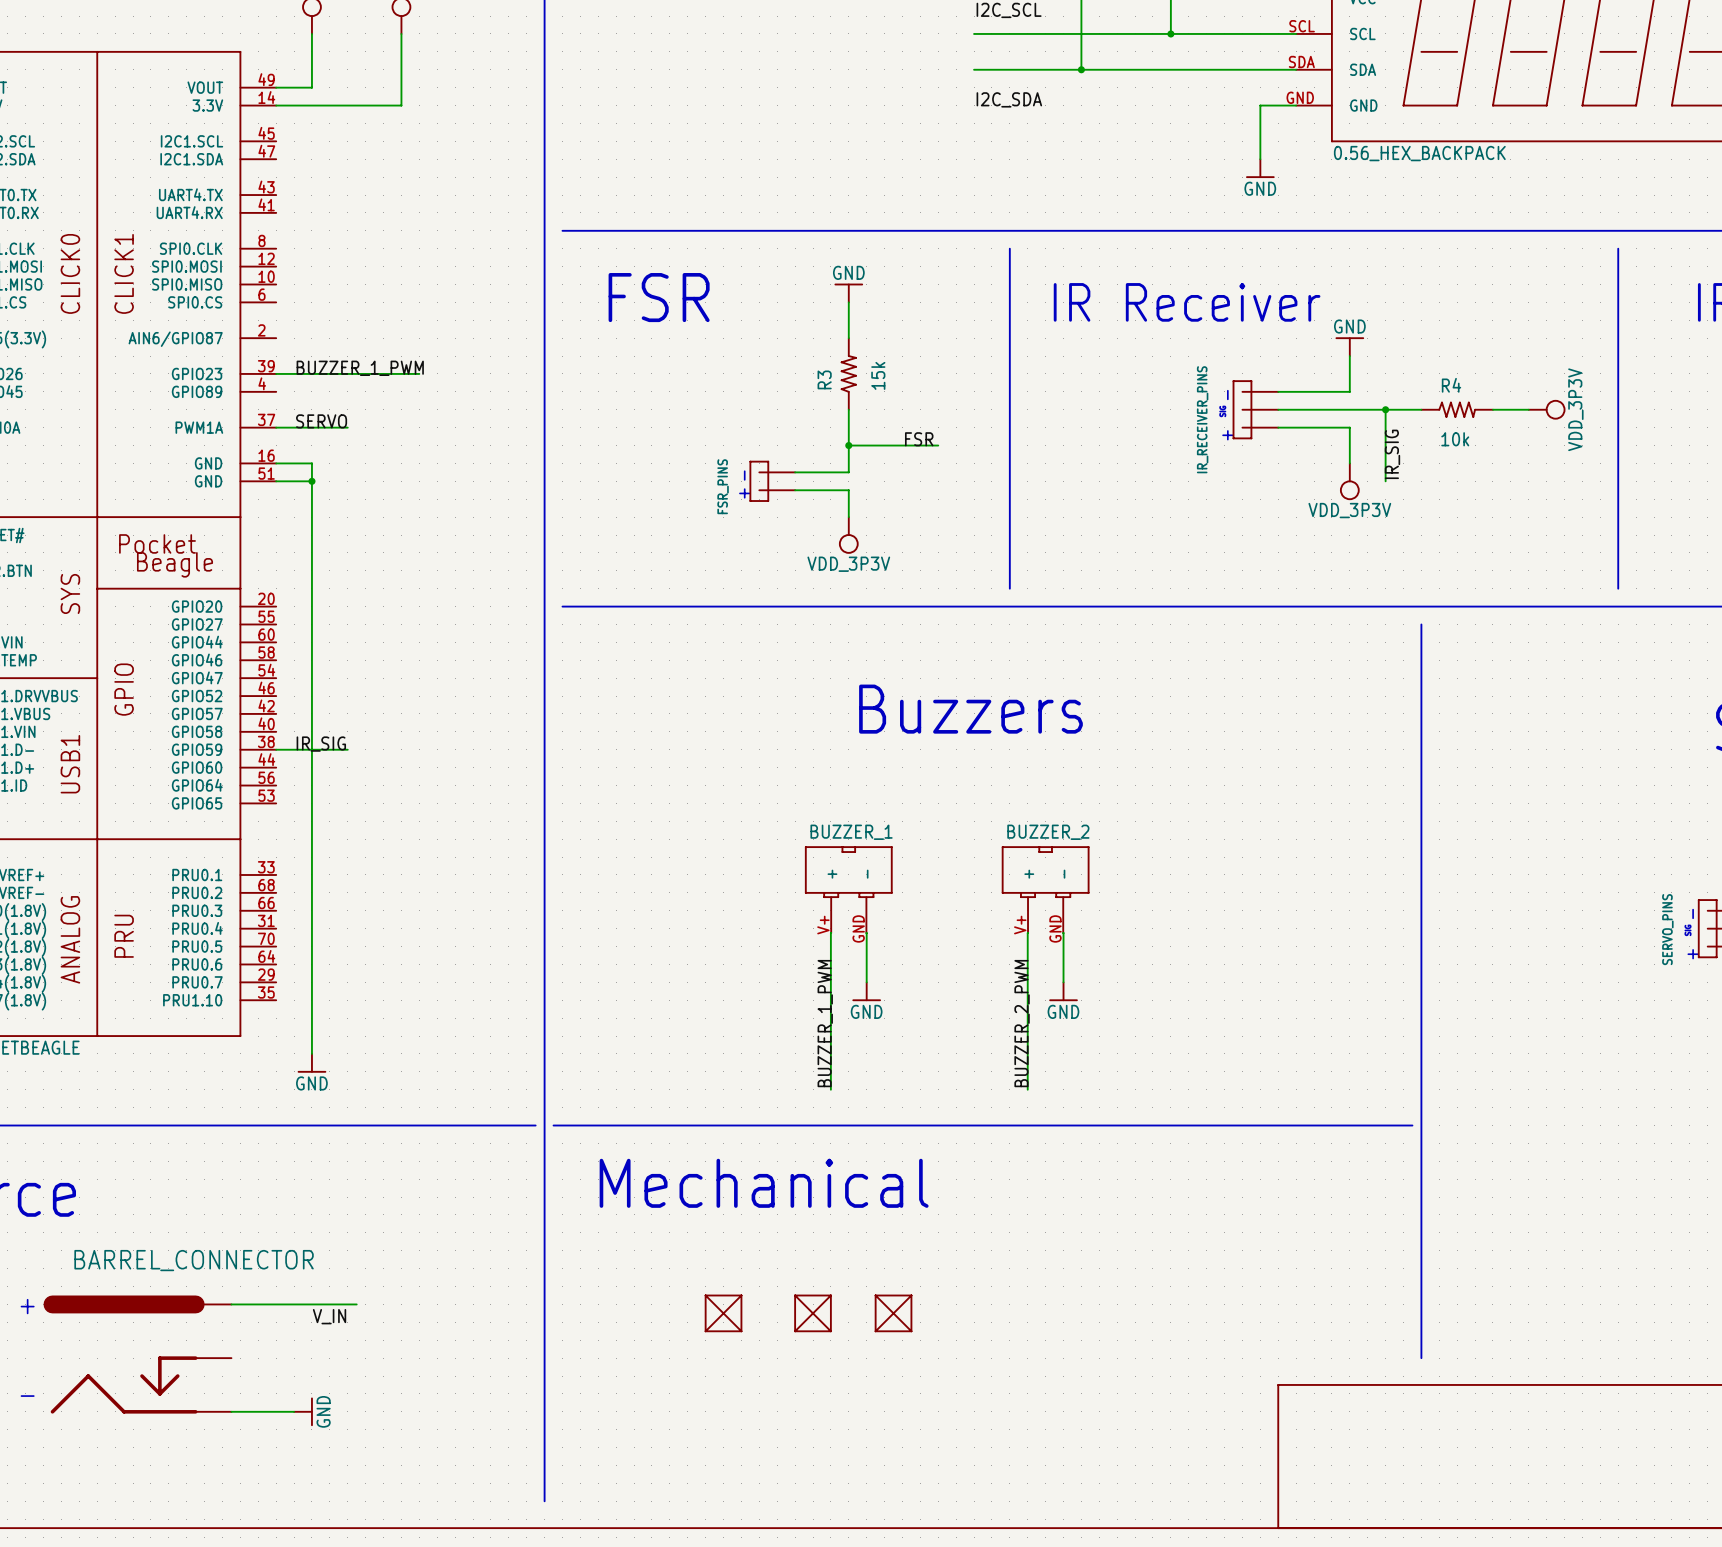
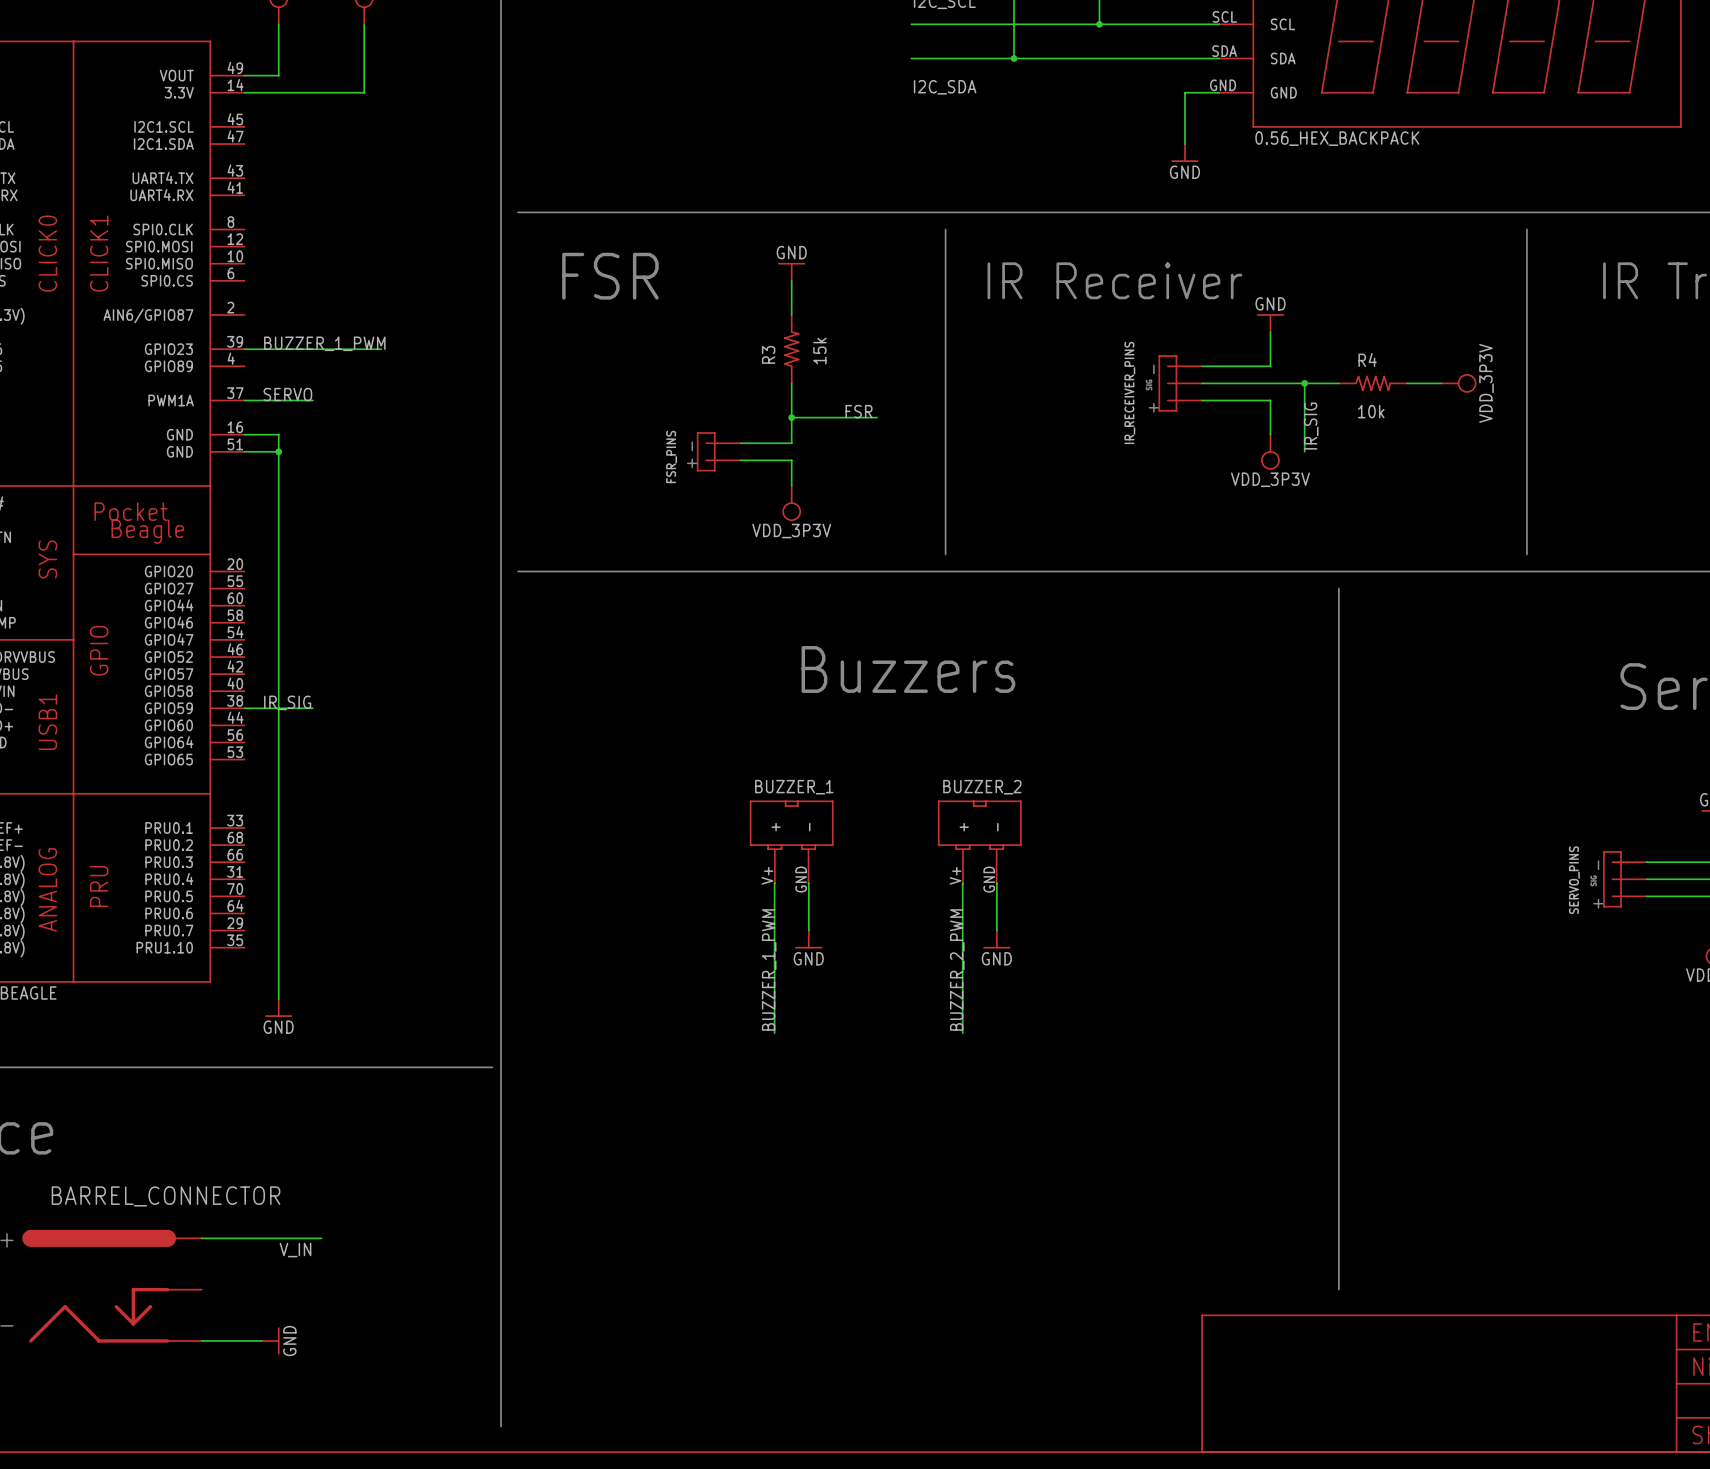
line: (553, 1125) (1412, 1125) -> none
text: Mechanical (764, 1183) -> none
part: (723, 1313) -> none
part: (813, 1313) -> none
part: (893, 1313) -> none

